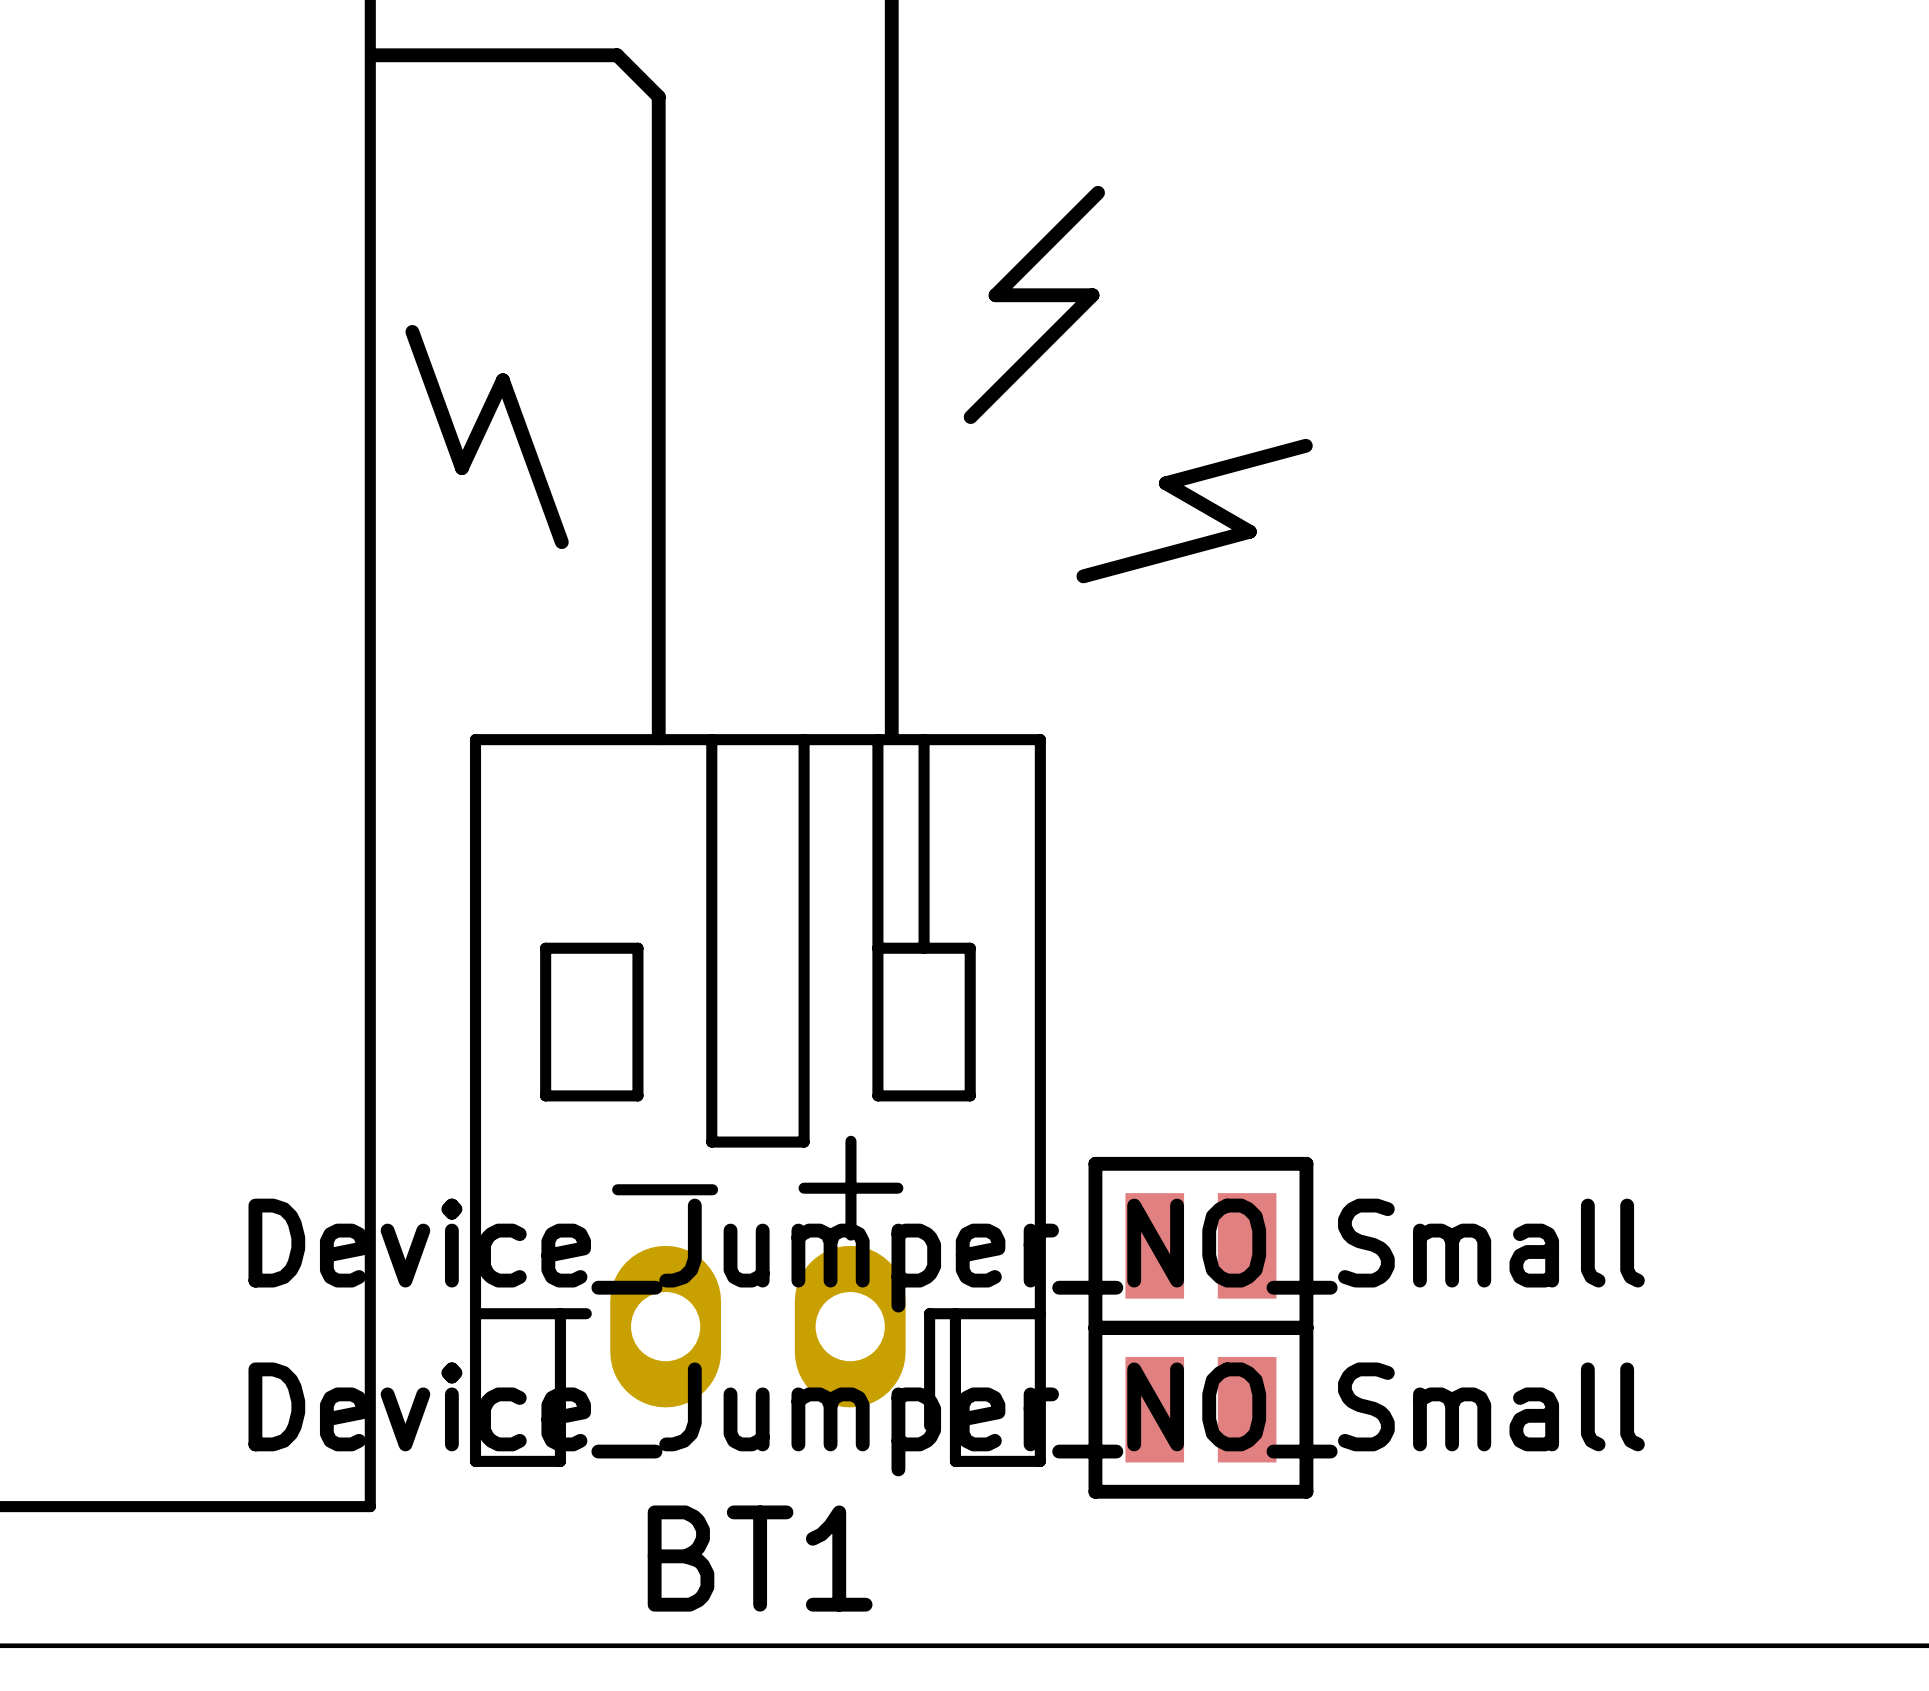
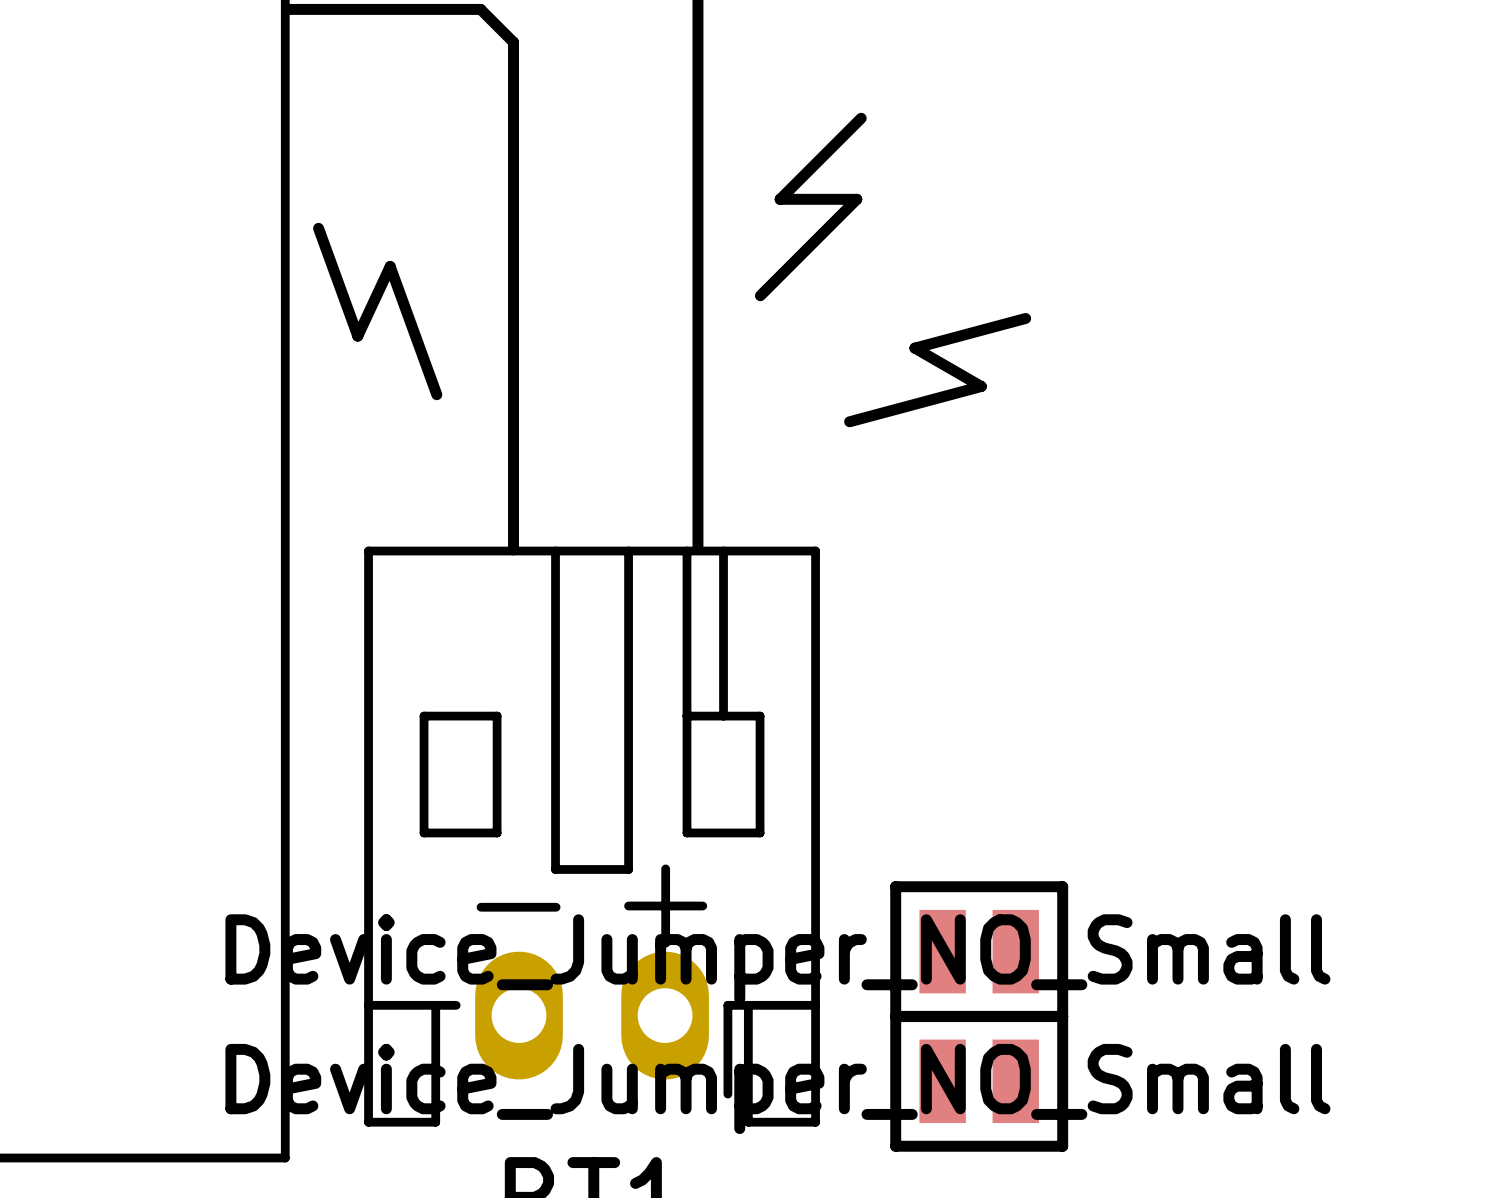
part position: (1200, 1245) -> (979, 951)
part position: (1200, 1409) -> (979, 1081)

